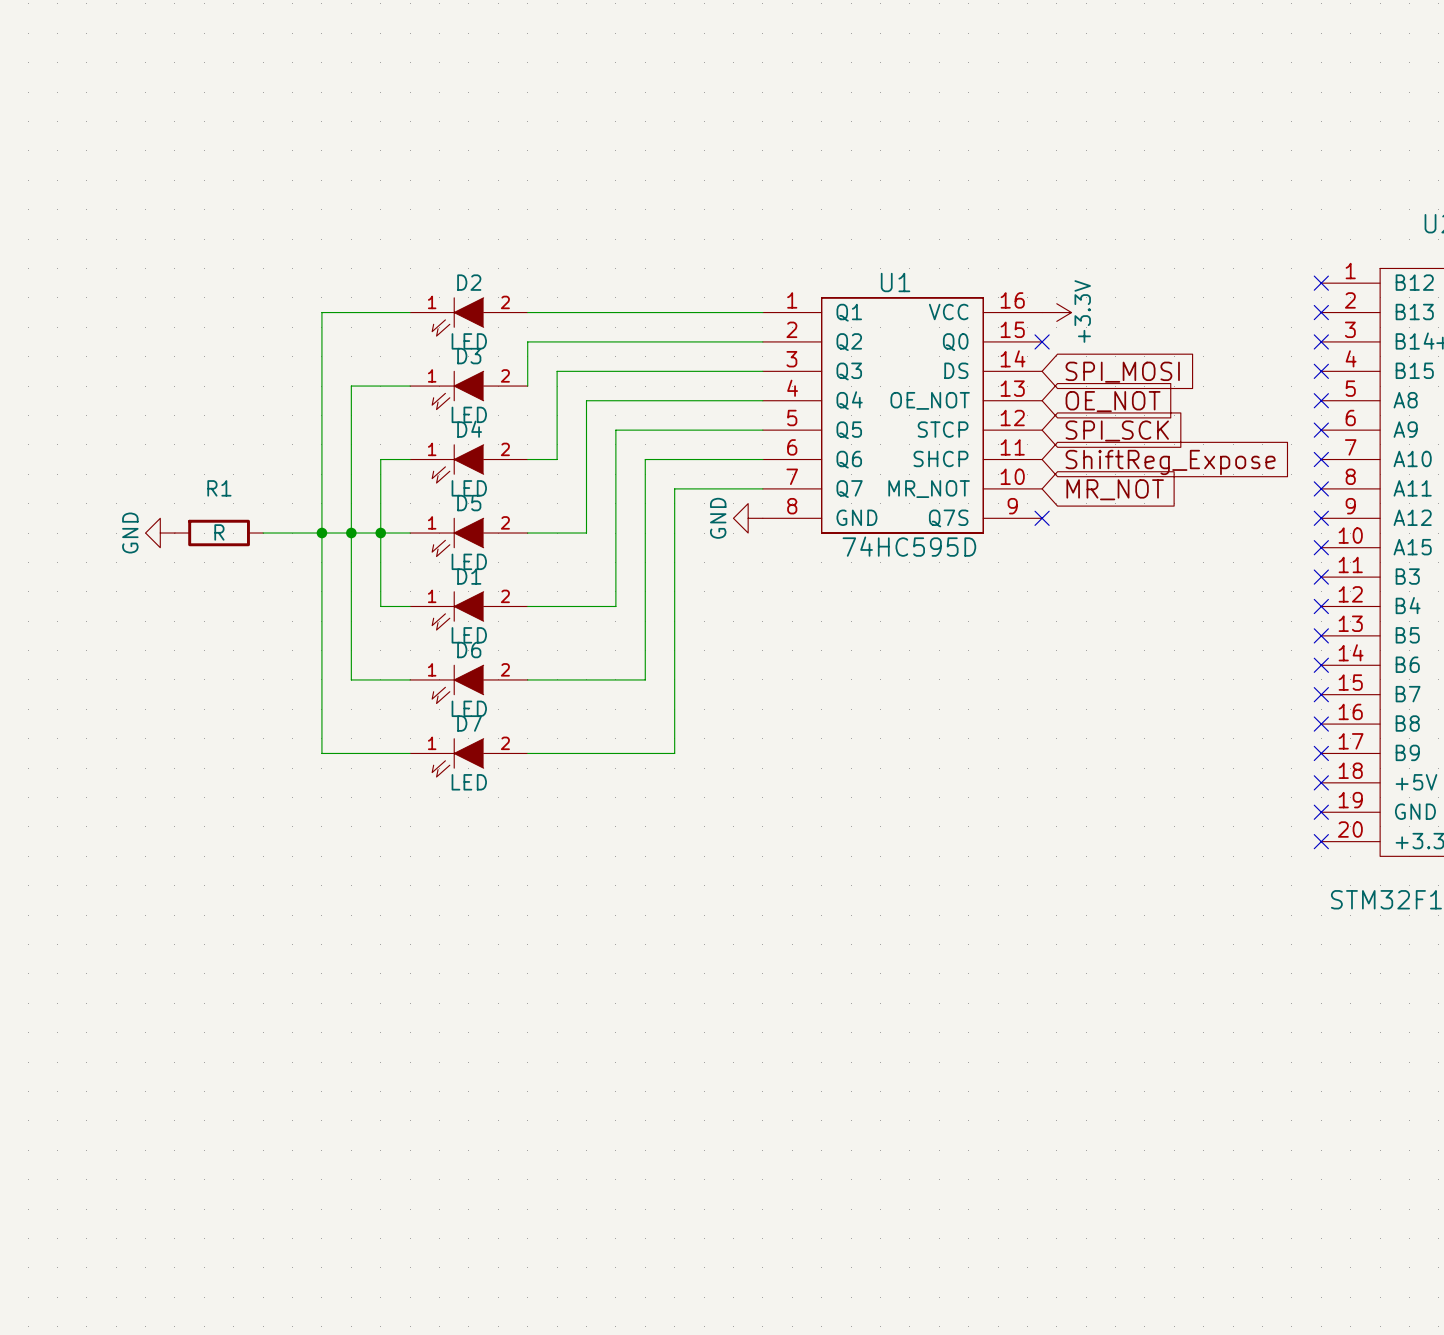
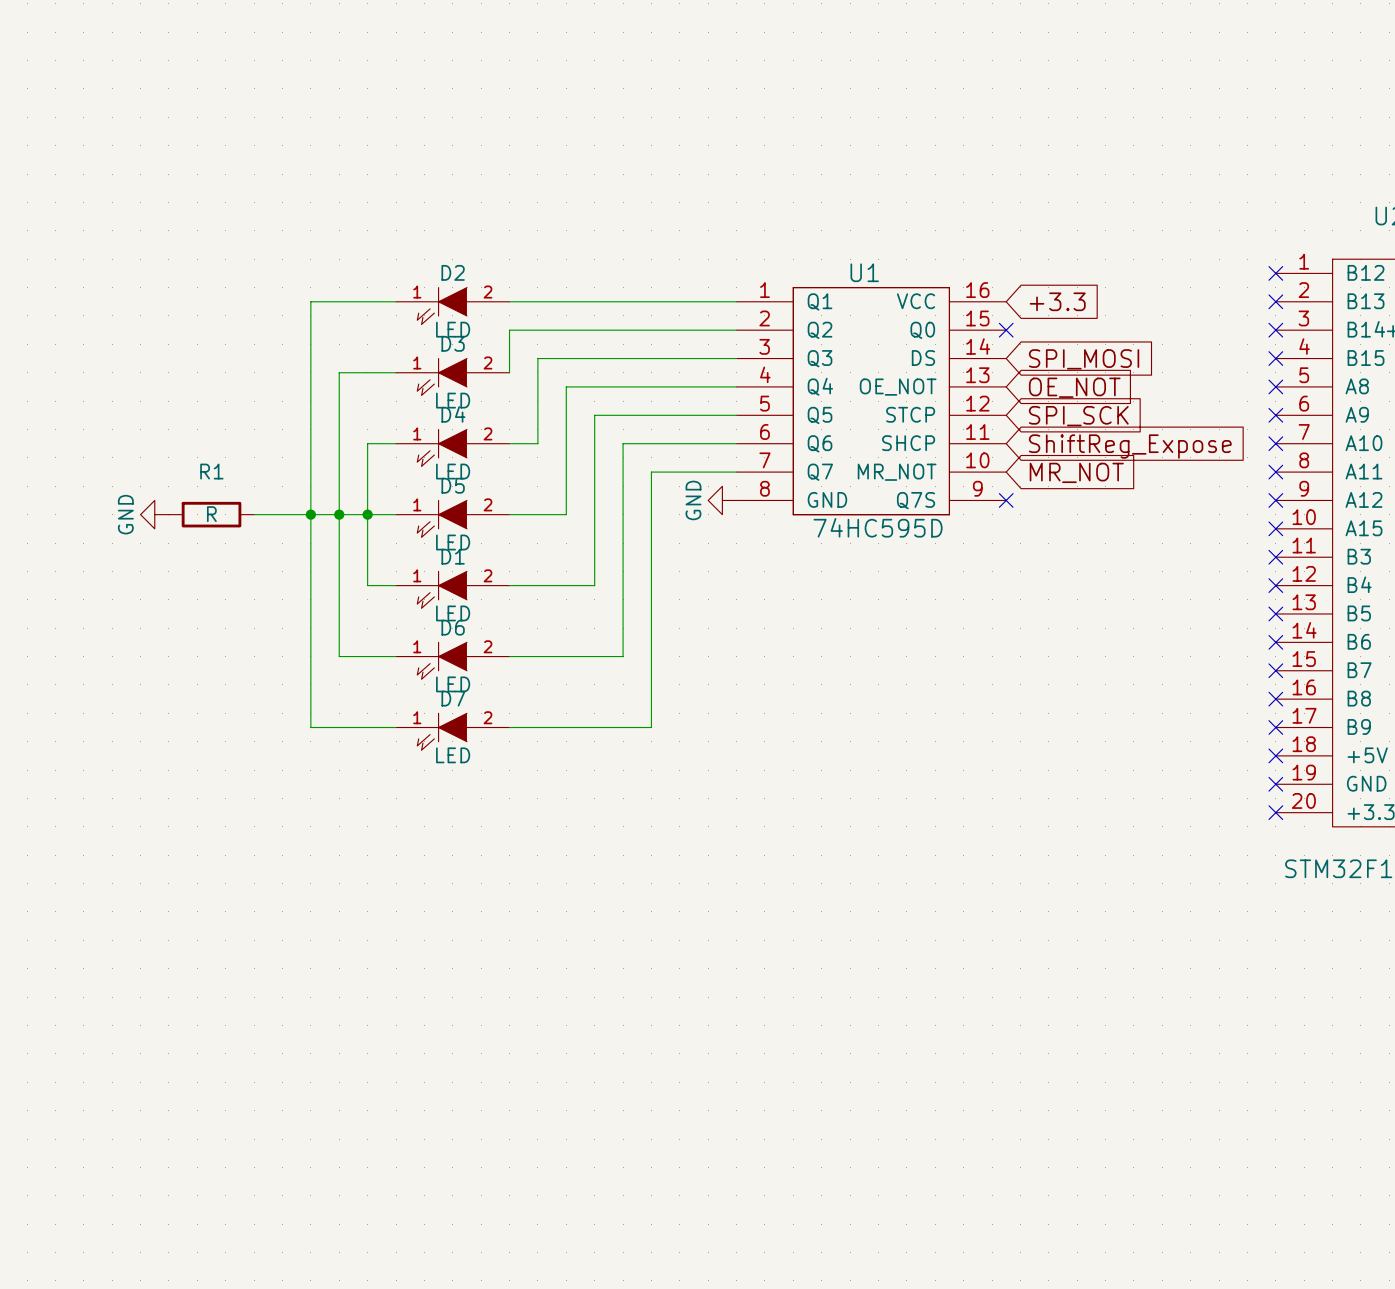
power symbol: +3.3V (1056, 312) -> none
global label: none -> +3.3 (1057, 301)

